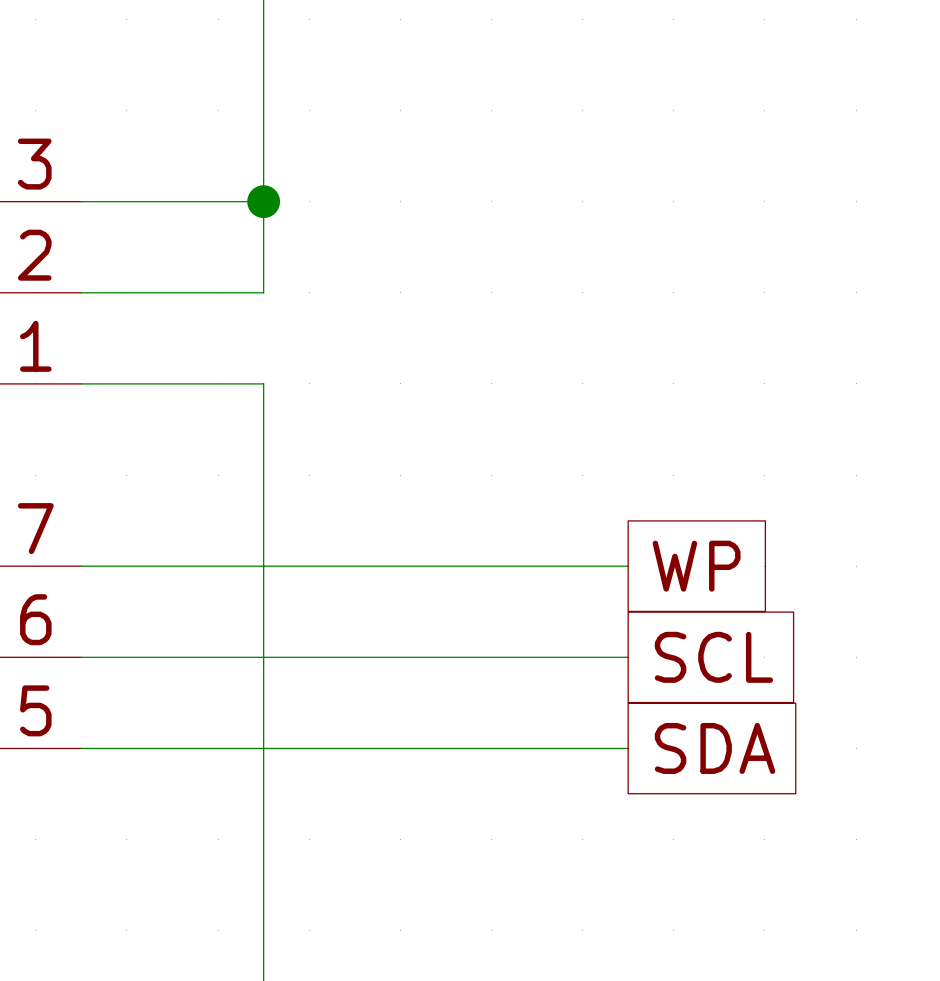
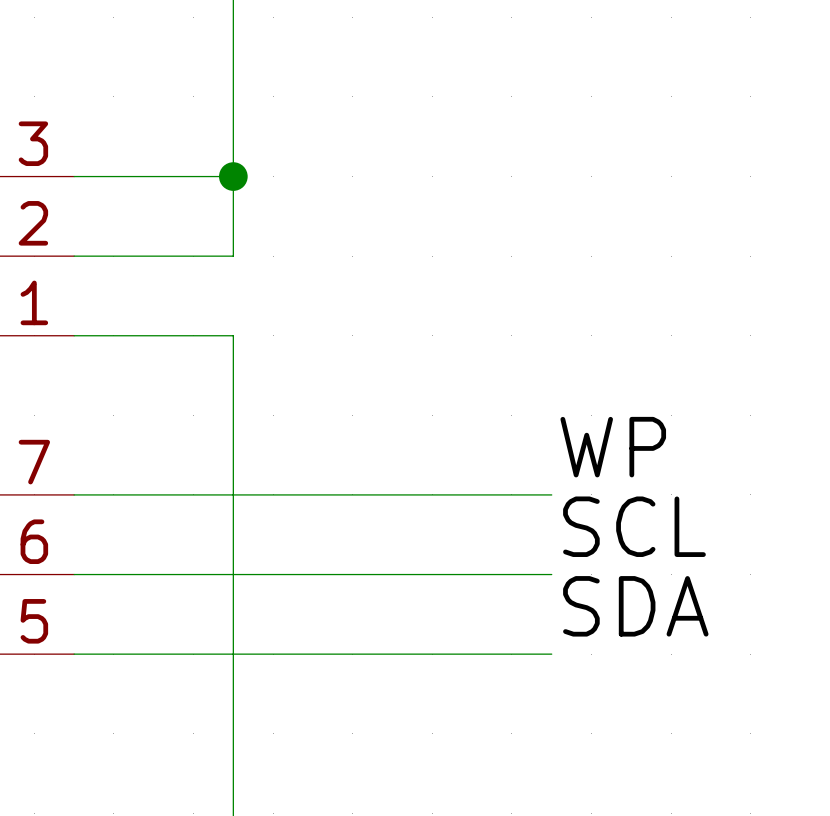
label: none -> WP (613, 447)
global label: WP (696, 566) -> none
label: none -> SCL (634, 526)
global label: SCL (713, 657) -> none
label: none -> SDA (635, 606)
global label: SDA (715, 748) -> none

